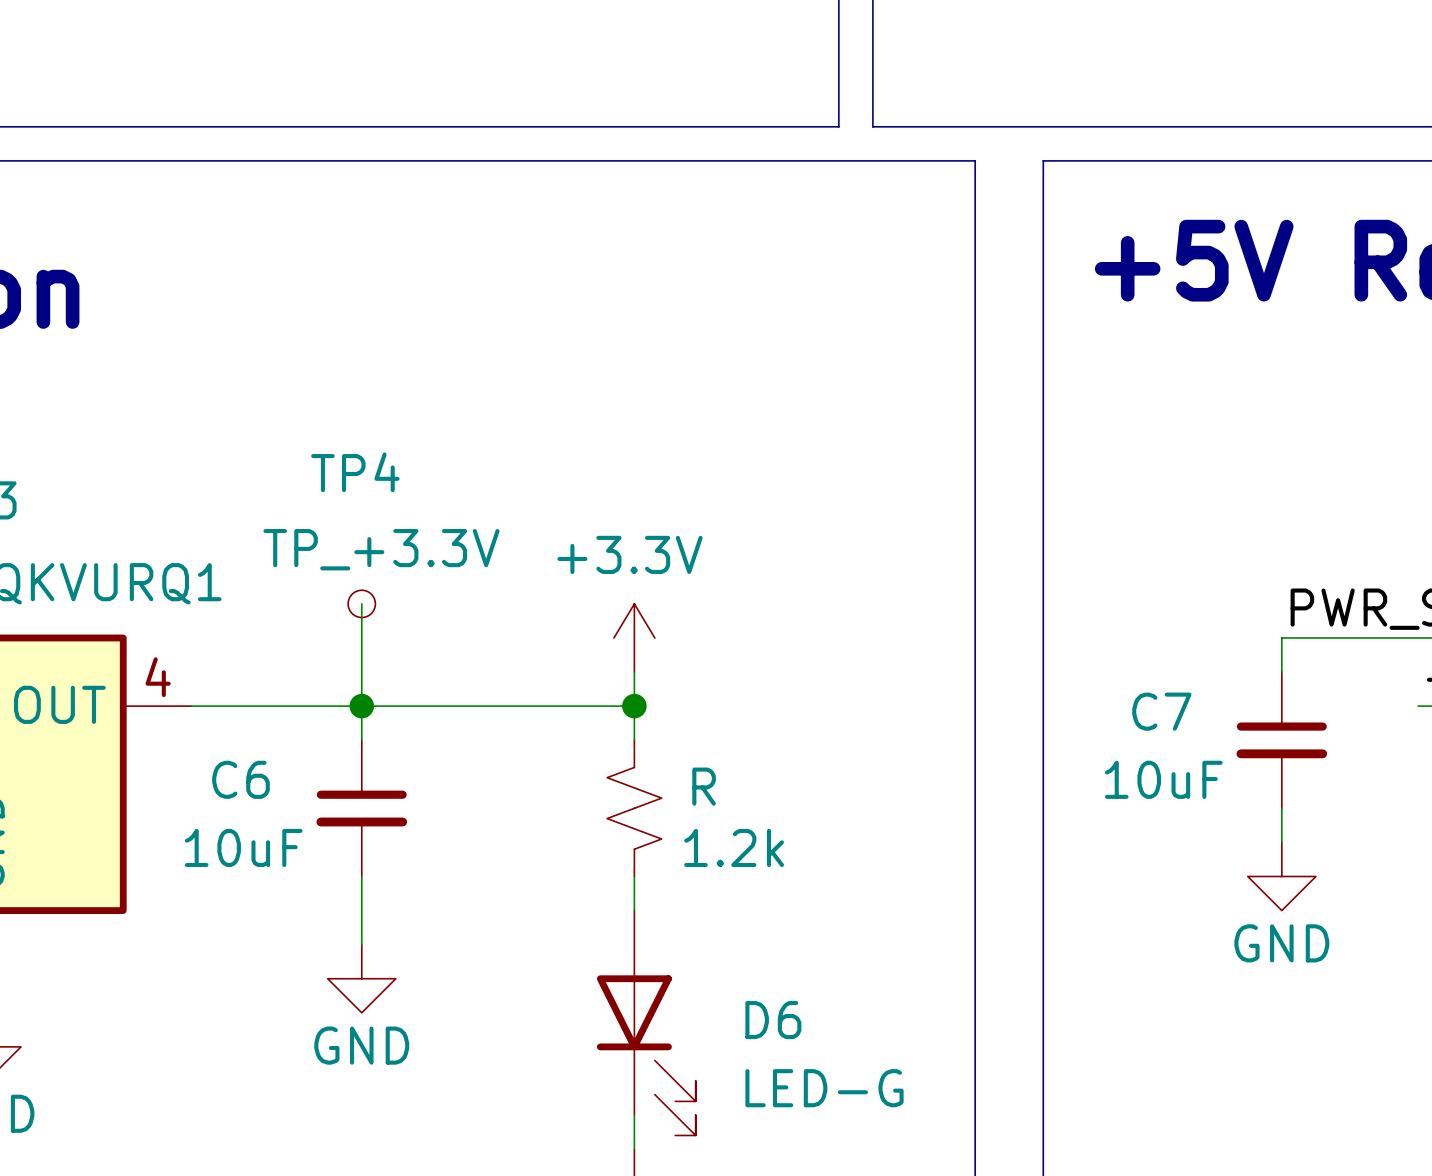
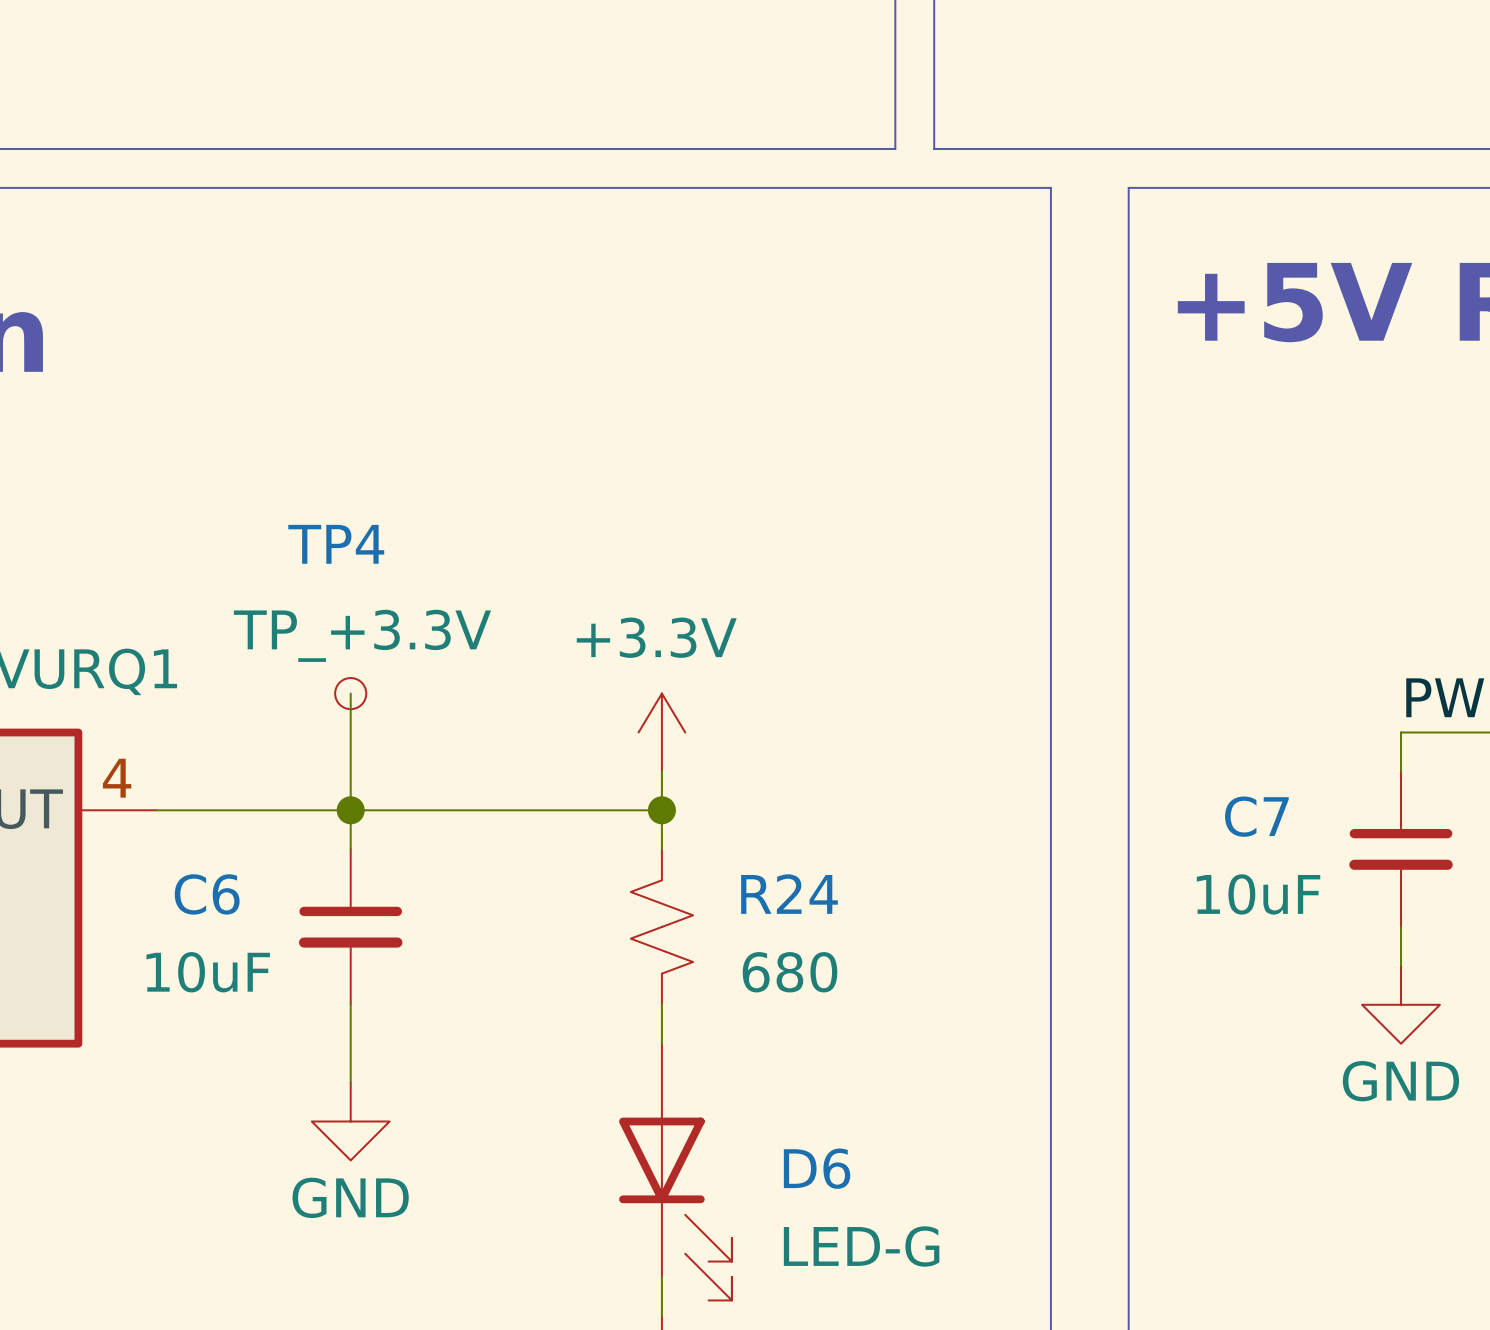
R name: R (704, 786) -> R24 (789, 894)
R value: 1.2k (734, 847) -> 680 (790, 972)

